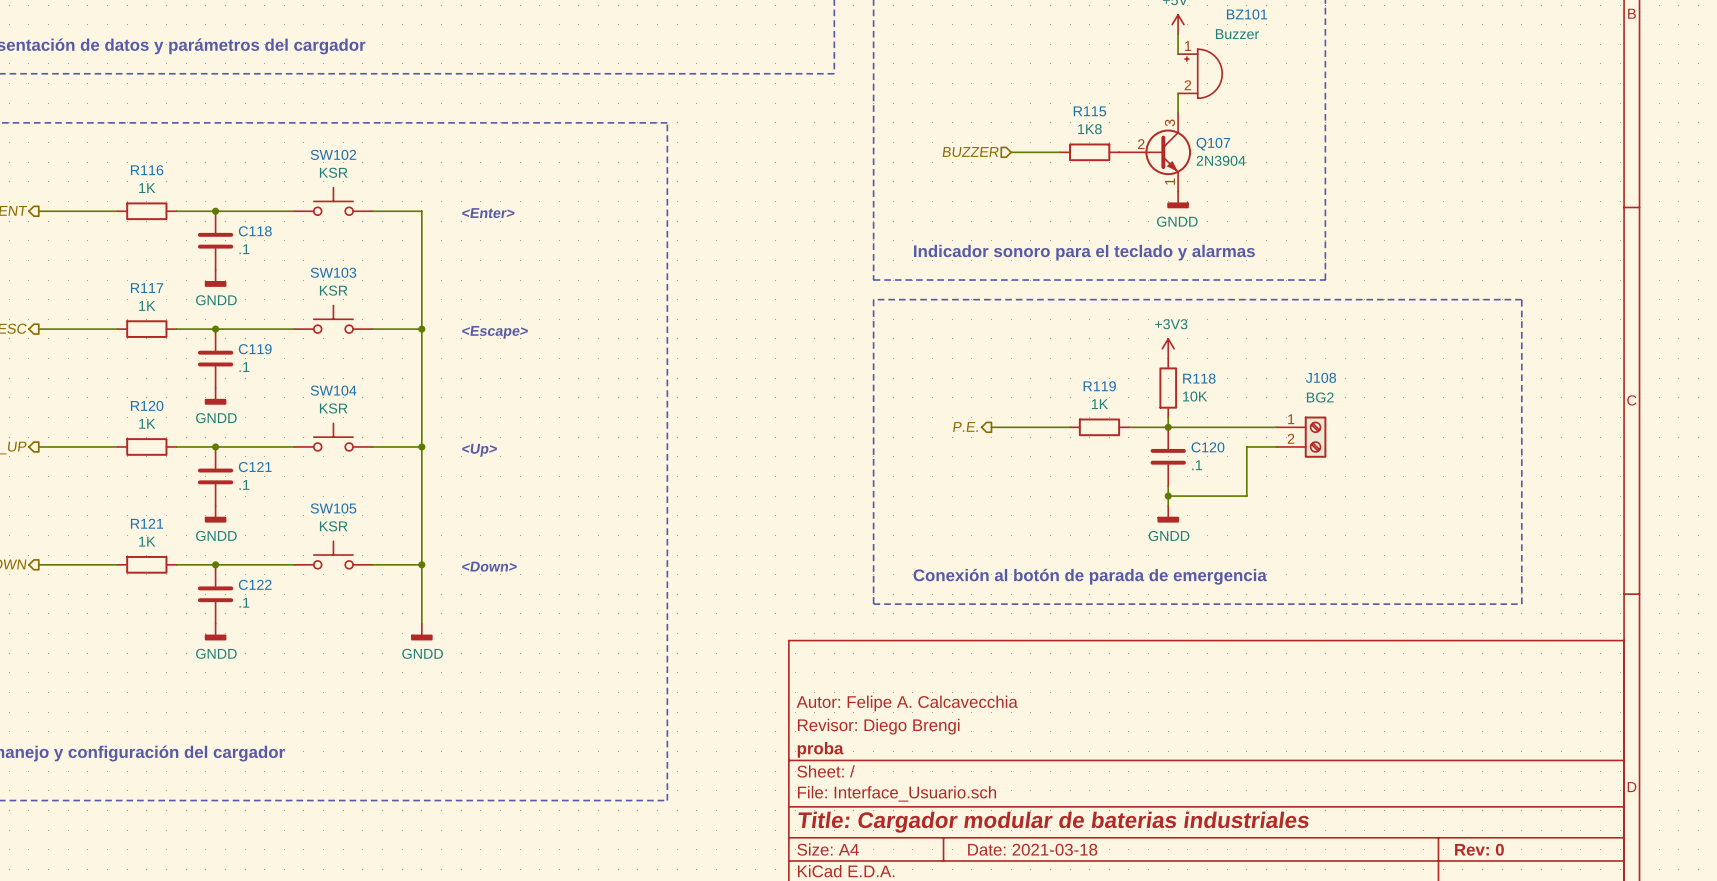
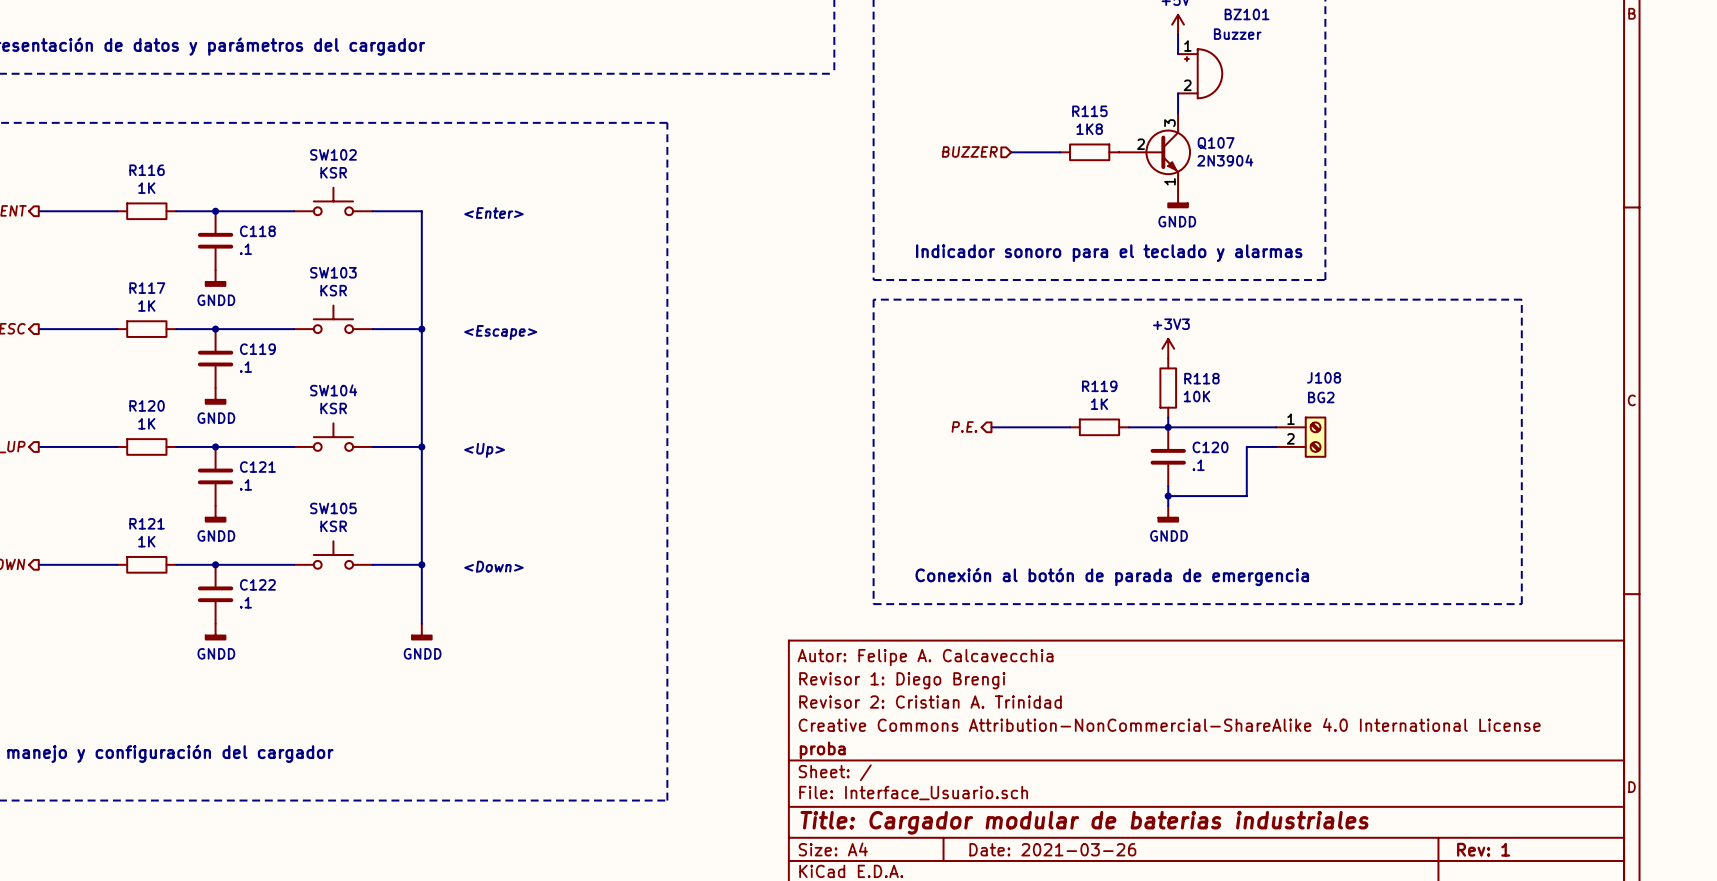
title block: none -> Autor: Felipe A. Calcavecchia (925, 657)
title block: none -> Revisor 1: Diego Brengi (902, 680)
title block: Autor: Felipe A. Calcavecchia (907, 703) -> Revisor 2: Cristian A. Trinidad (930, 702)
title block: Revisor: Diego Brengi (878, 726) -> Creative Commons Attribution-NonCommercial-ShareAlike 4.0 International License (1169, 724)
title block: Date: 2021-03-18 (1032, 849) -> Date: 2021-03-26 (1052, 849)
title block: Rev: 0 (1479, 849) -> Rev: 1 (1483, 849)

